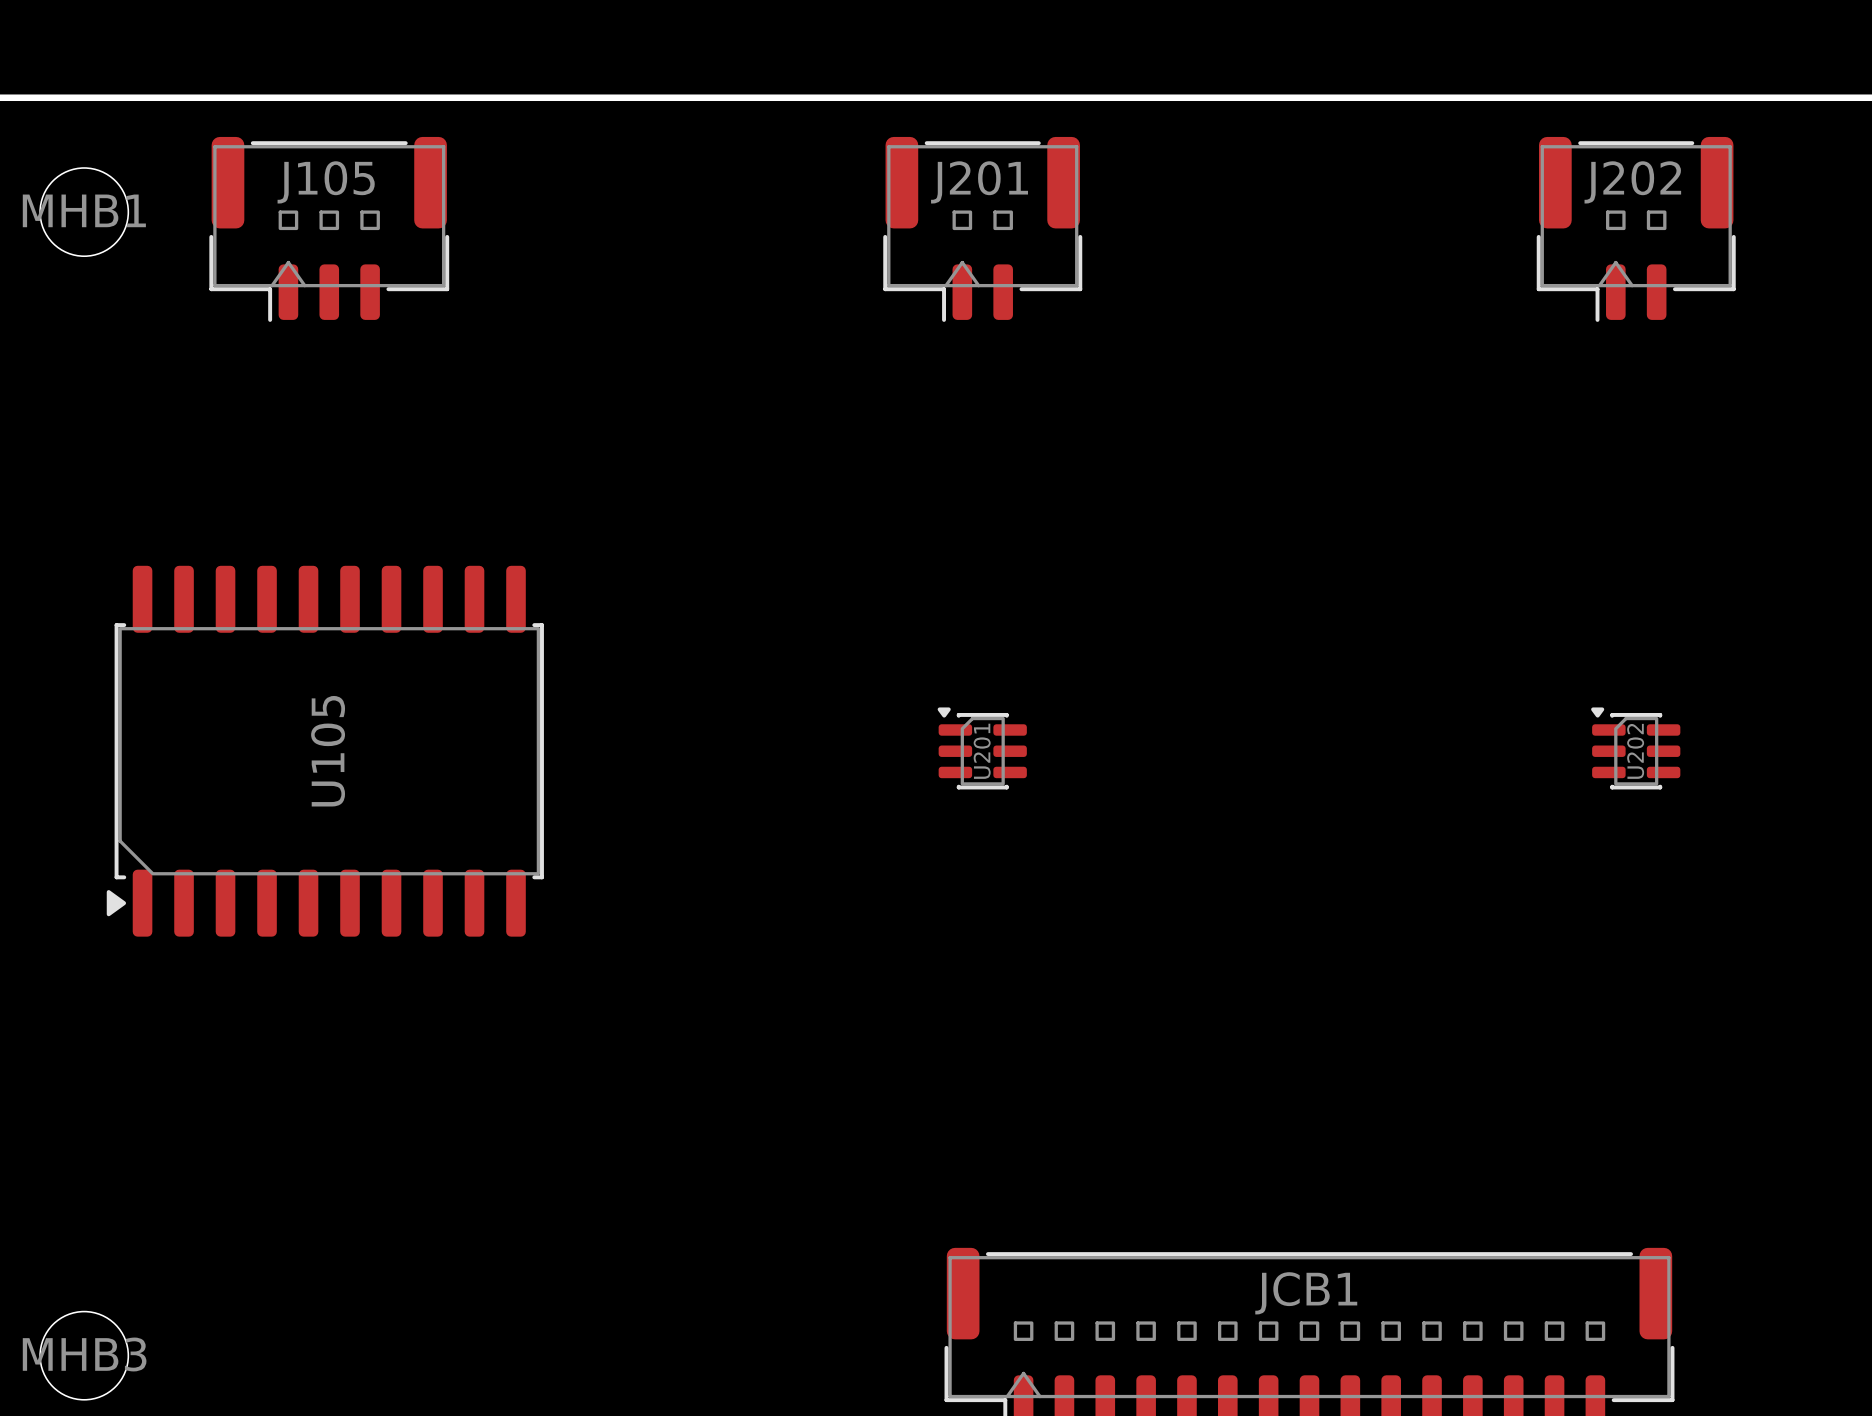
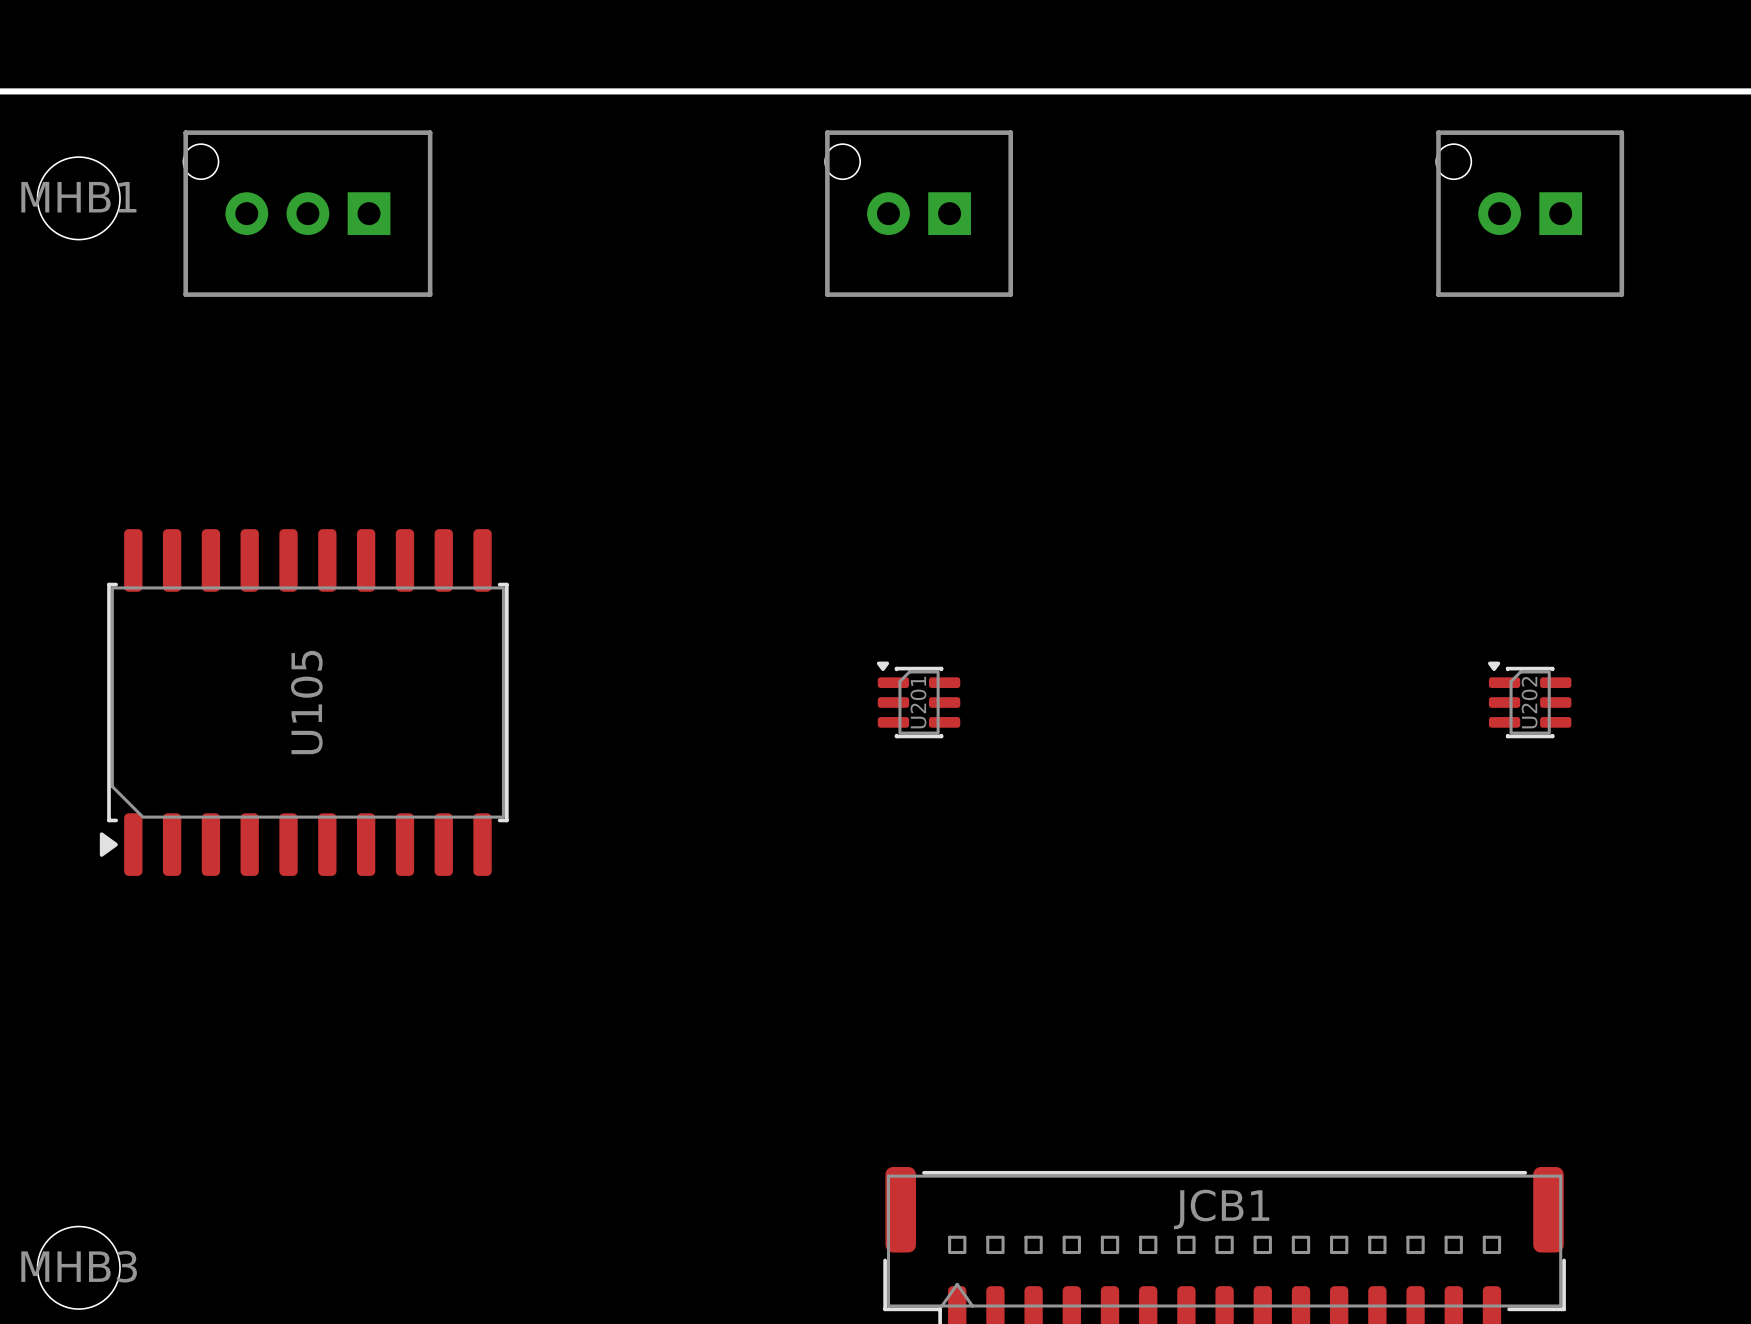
part: none -> (307, 213)
part: none -> (919, 213)
part: none -> (1530, 213)
J105: (329, 229) -> none
J201: (982, 229) -> none
J202: (1636, 229) -> none

